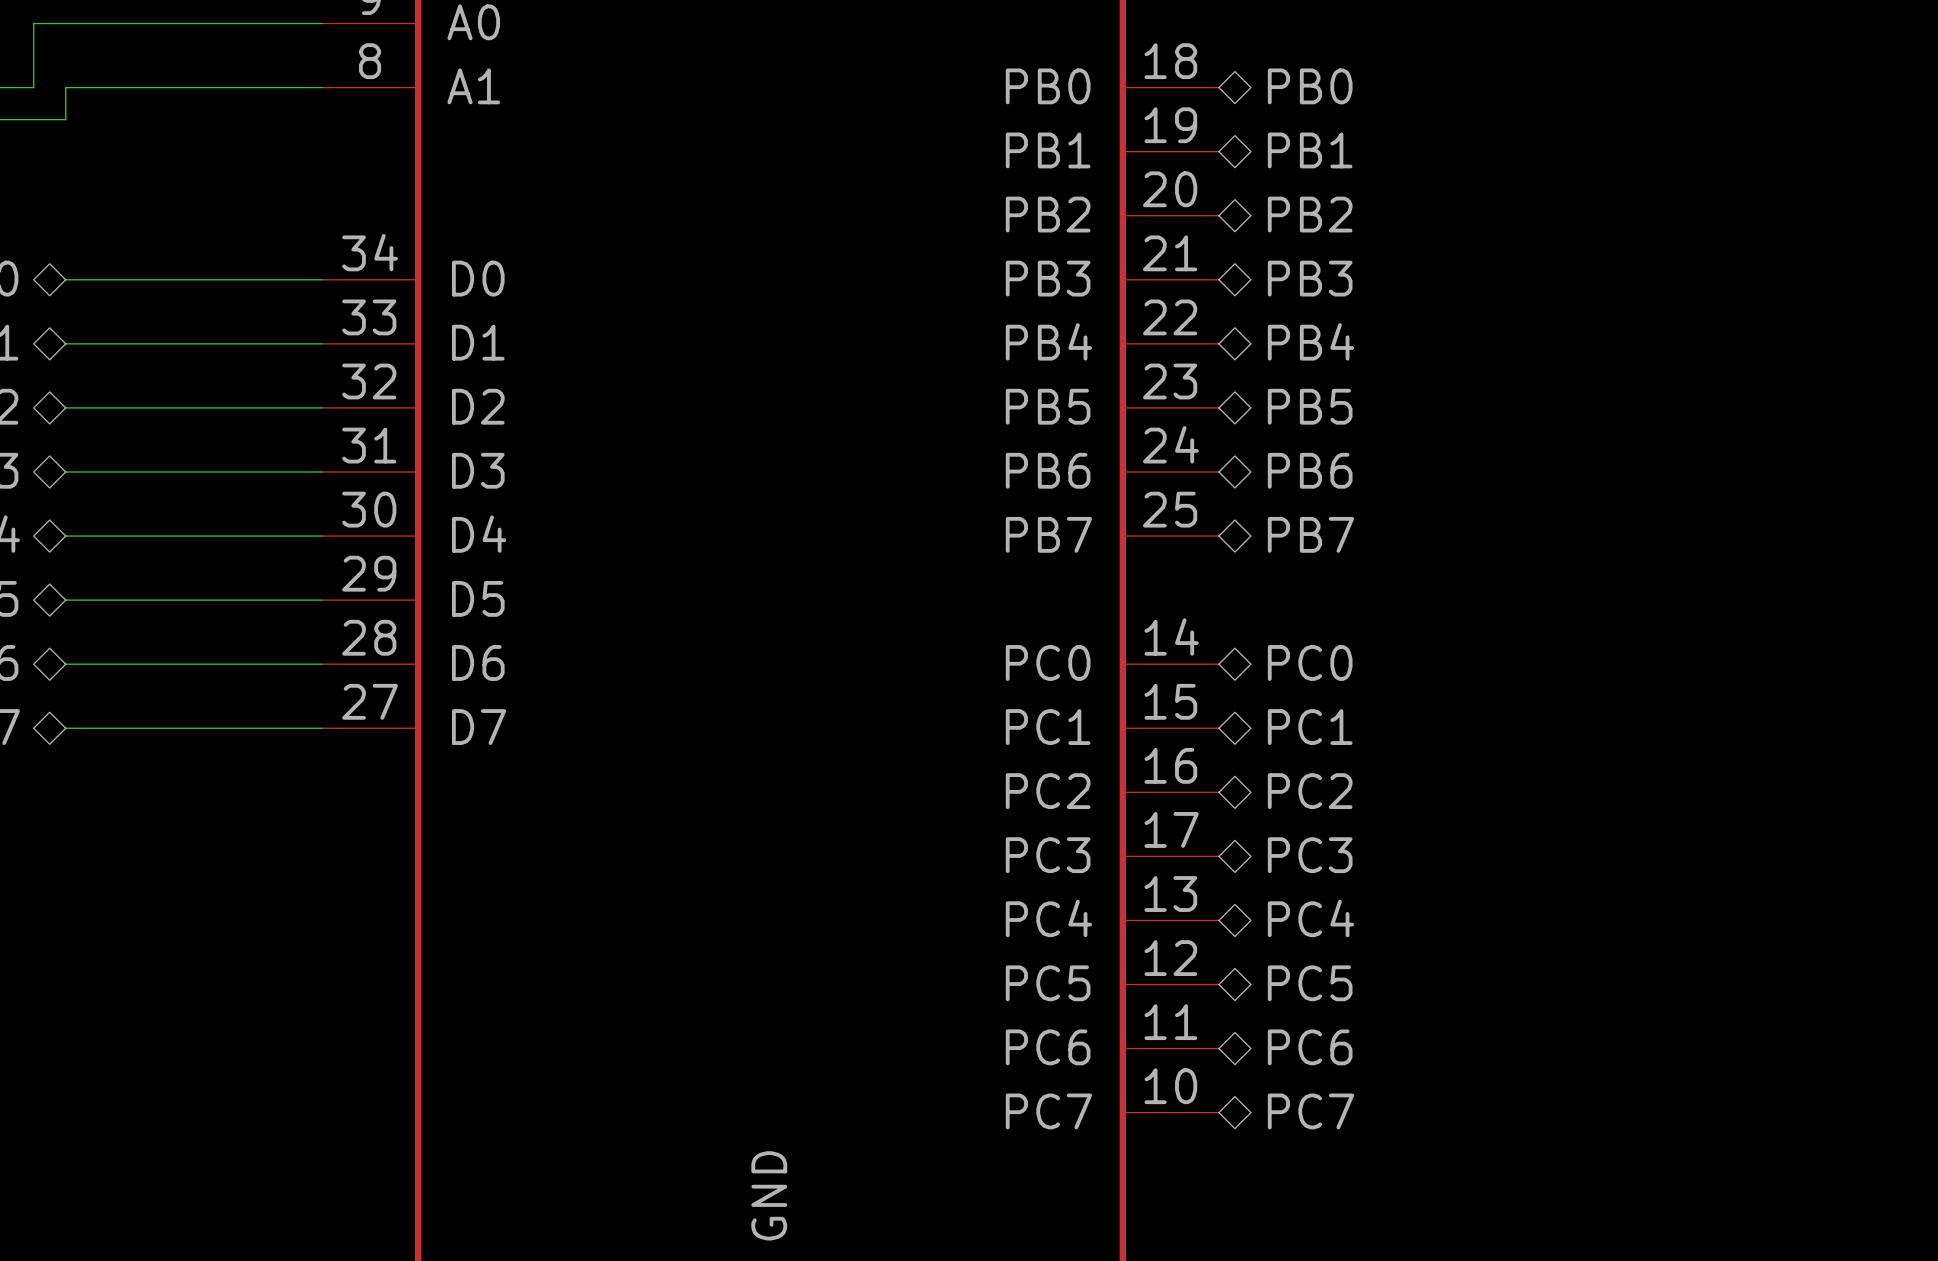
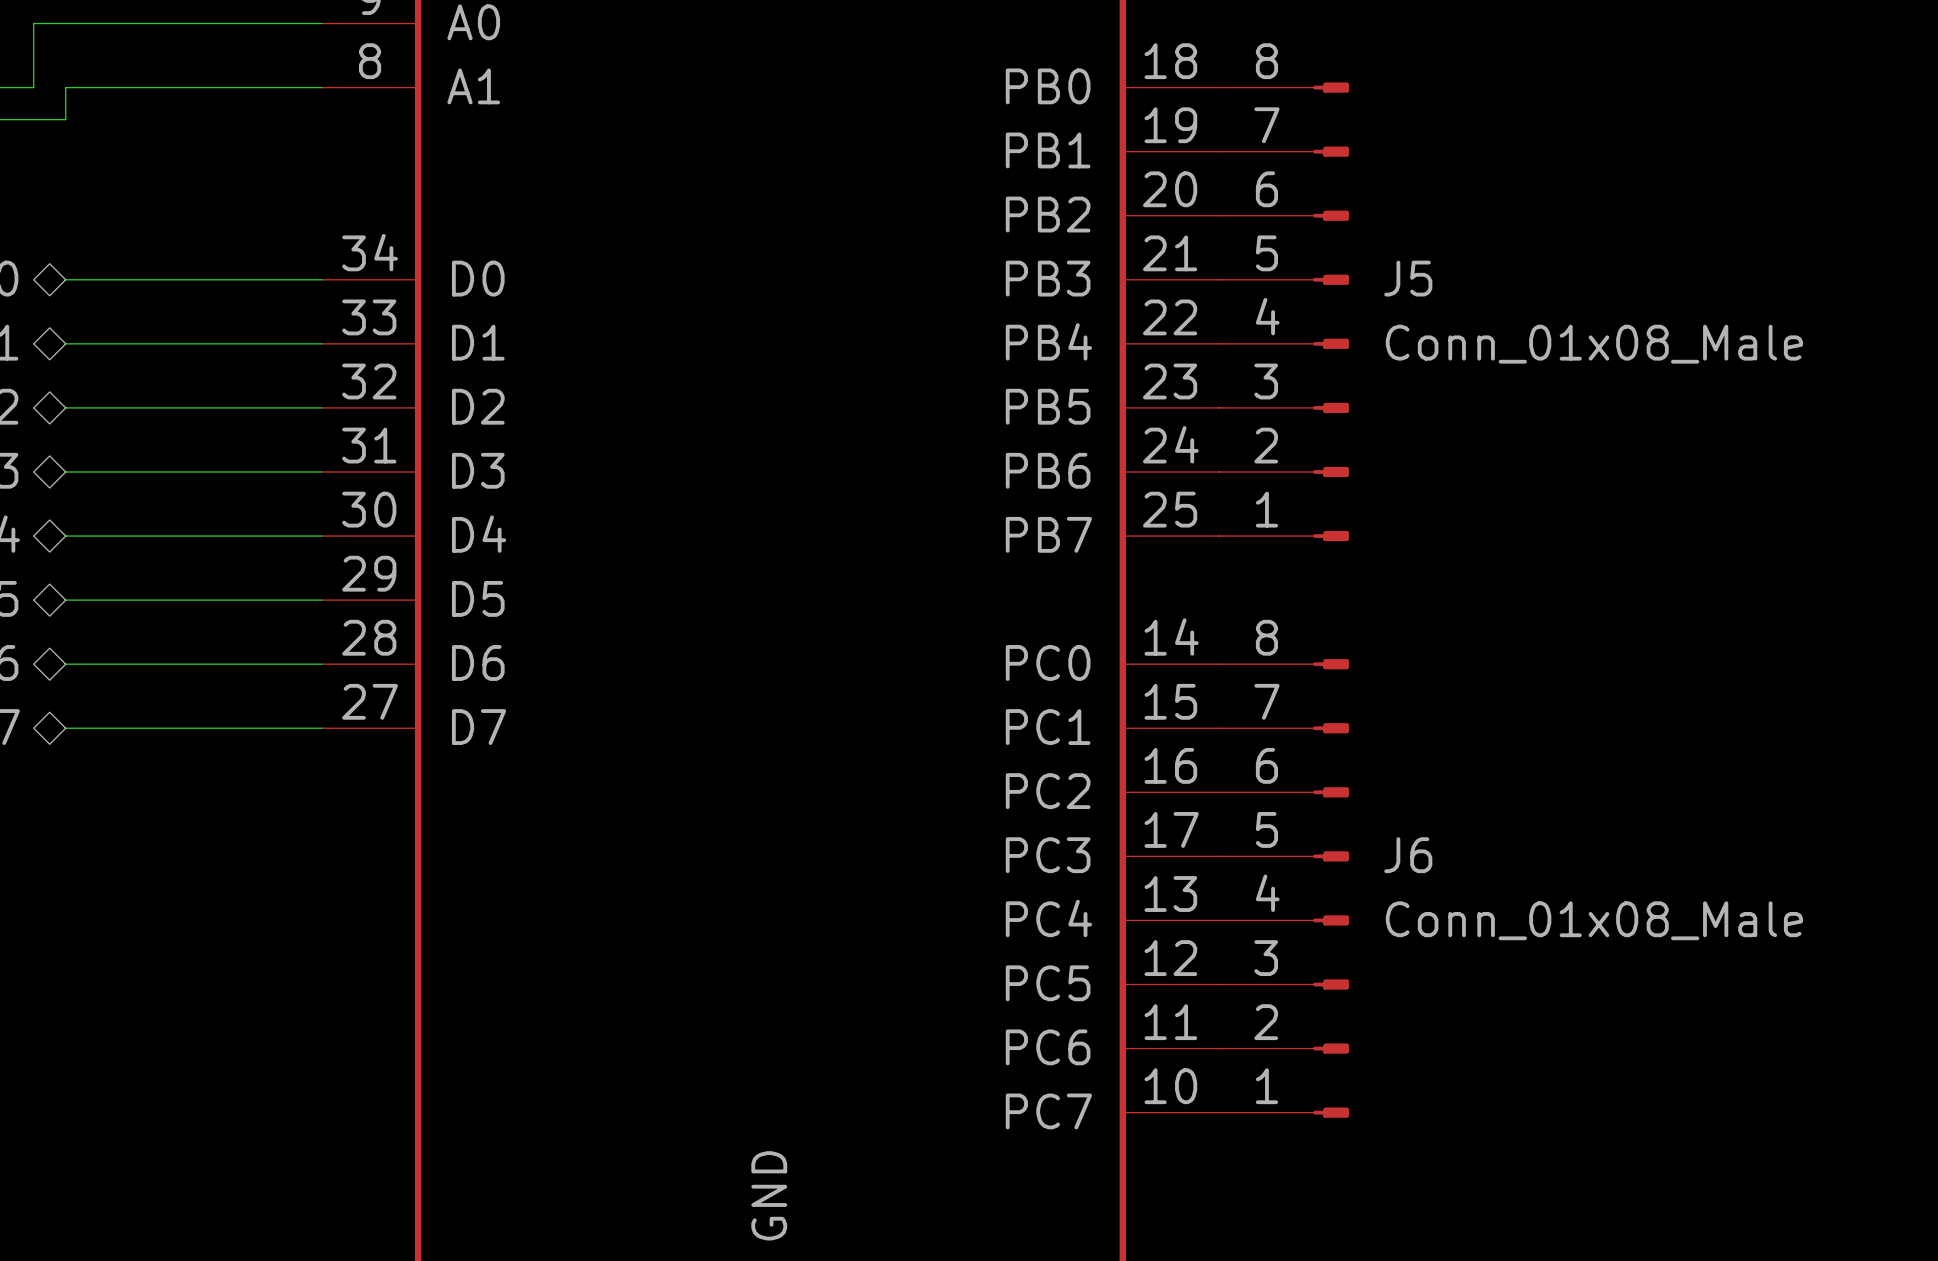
hierarchical label: PB0 (1310, 86) -> none
hierarchical label: PB1 (1310, 150) -> none
hierarchical label: PB2 (1310, 214) -> none
hierarchical label: PB3 (1310, 278) -> none
J5: none -> Conn_01x08_Male (1283, 311)
hierarchical label: PB4 (1310, 341) -> none
hierarchical label: PB5 (1310, 406) -> none
hierarchical label: PB6 (1310, 470) -> none
hierarchical label: PB7 (1310, 534) -> none
hierarchical label: PC0 (1310, 662) -> none
hierarchical label: PC1 (1310, 727) -> none
hierarchical label: PC2 (1310, 791) -> none
hierarchical label: PC3 (1310, 855) -> none
J6: none -> Conn_01x08_Male (1283, 888)
hierarchical label: PC4 (1310, 918) -> none
hierarchical label: PC5 (1310, 983) -> none
hierarchical label: PC6 (1310, 1047) -> none
hierarchical label: PC7 (1310, 1111) -> none

